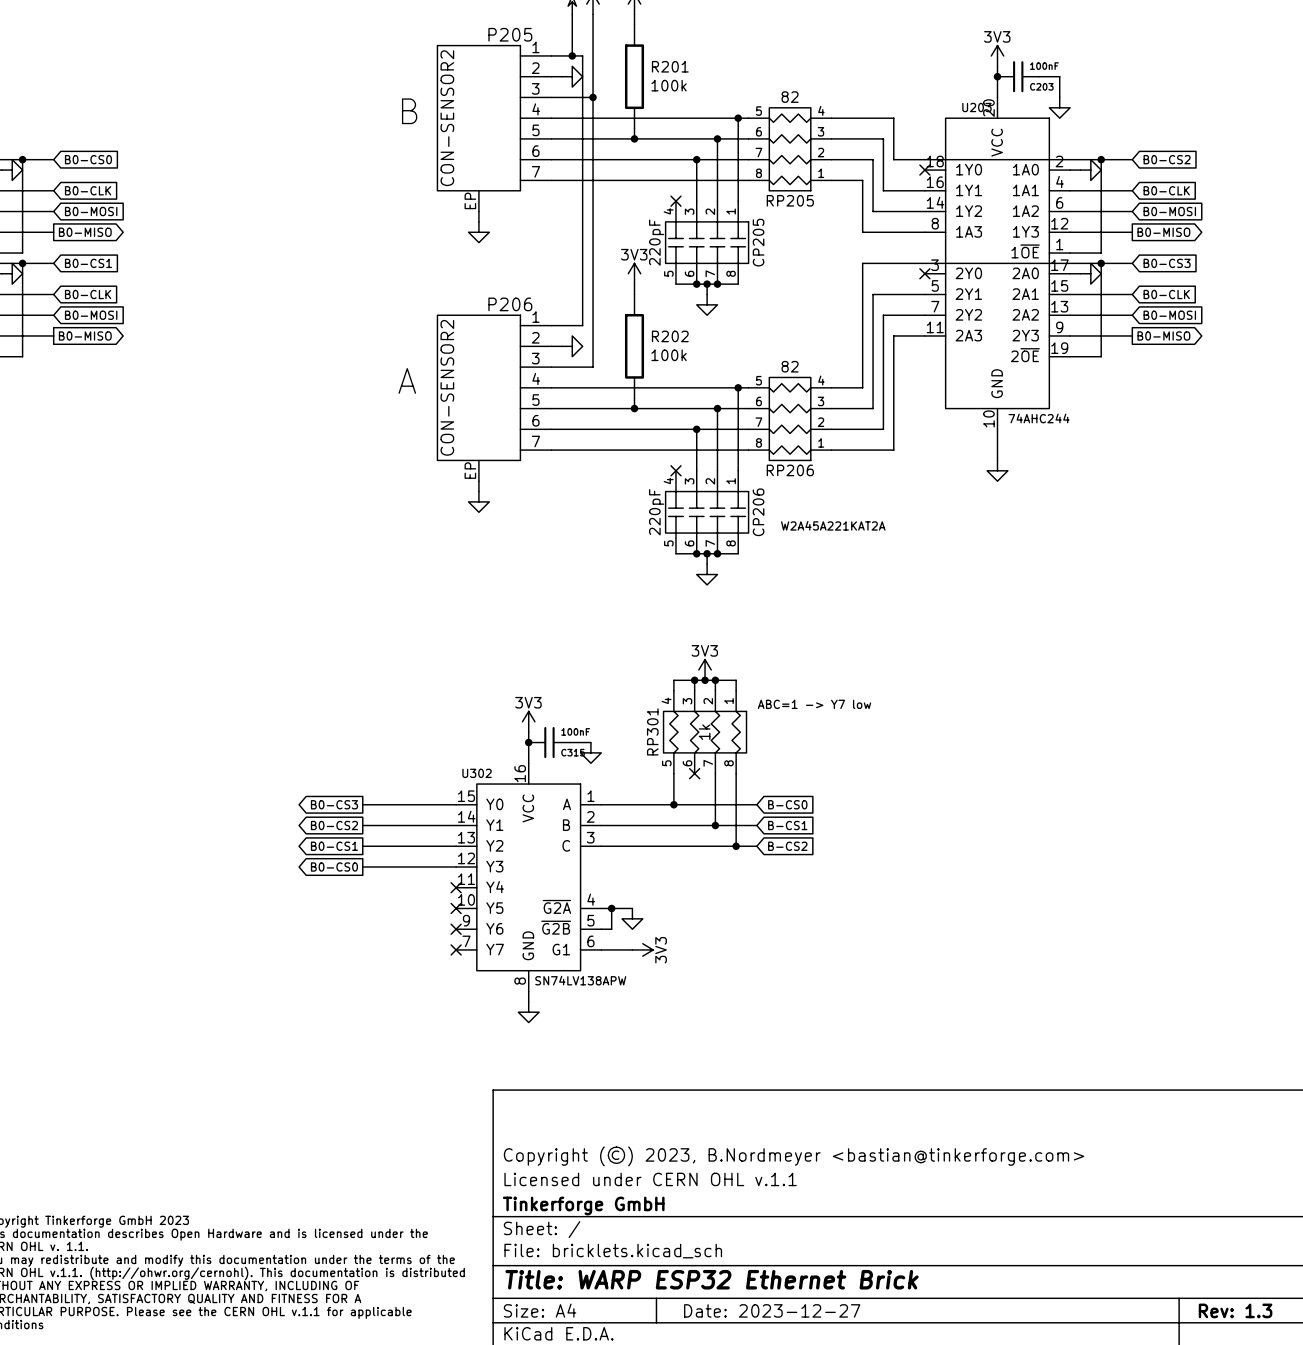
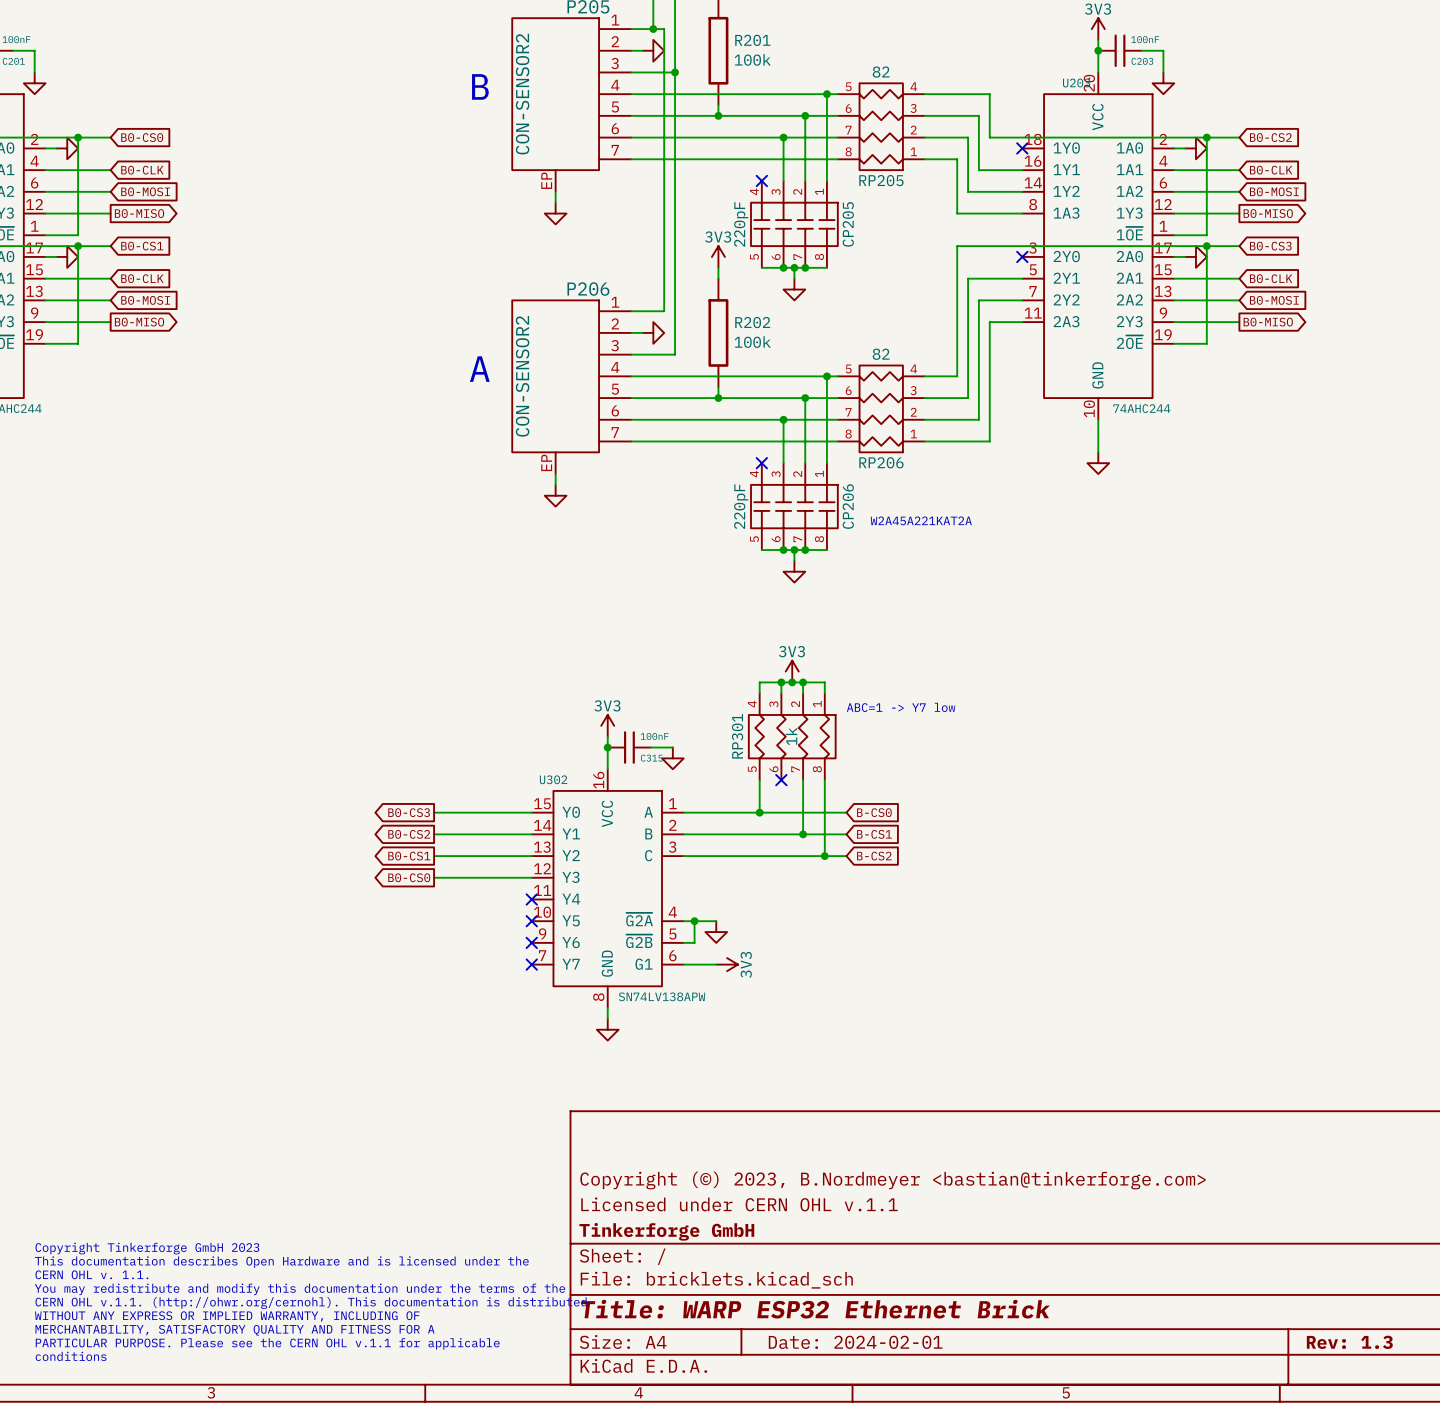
title block: Date: 2023-12-27 (772, 1310) -> Date: 2024-02-01 (855, 1342)

